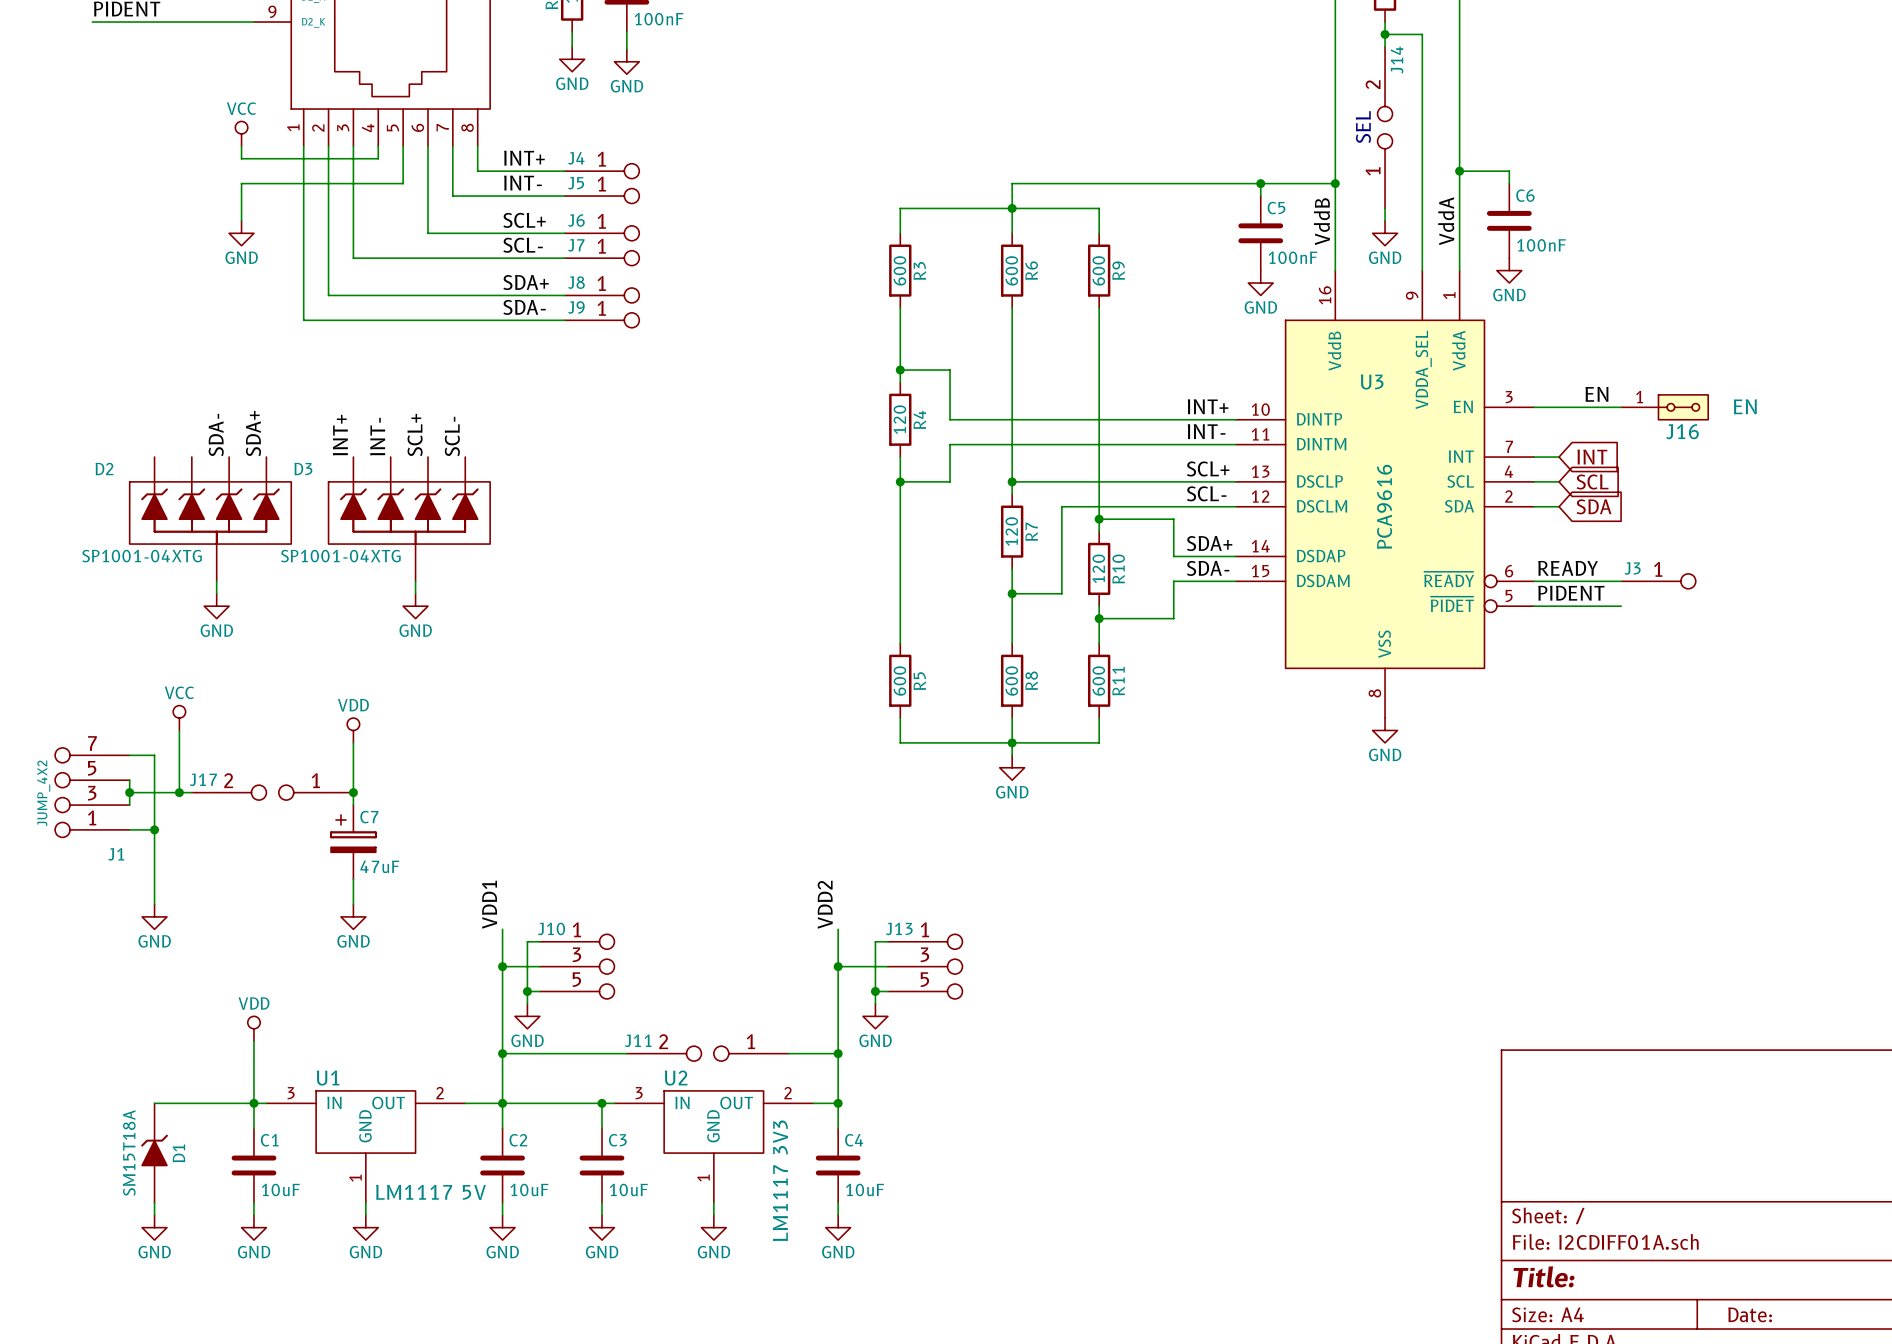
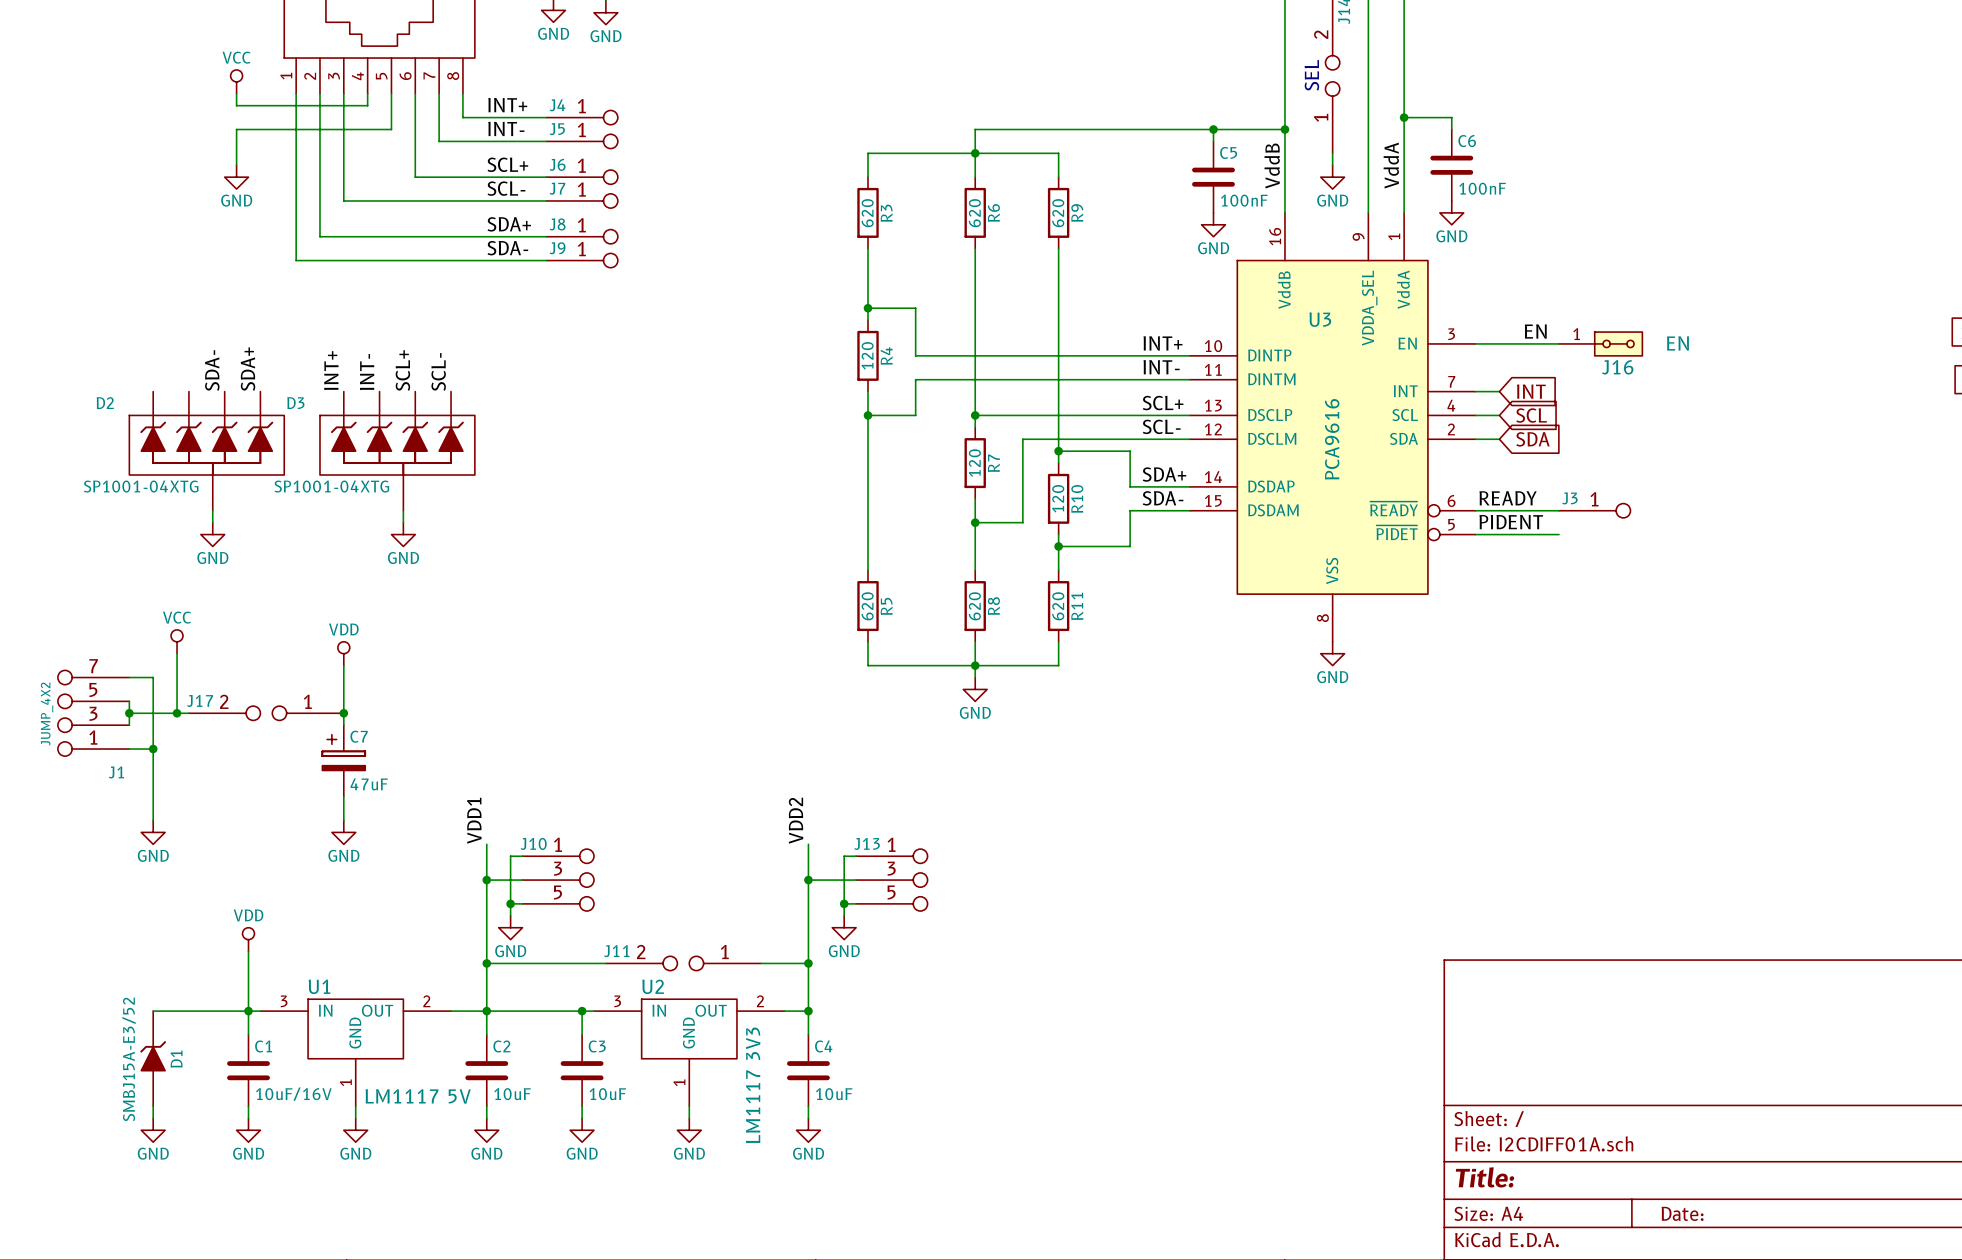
R3 value: 600 (899, 270) -> 620 (867, 213)
R6 value: 600 (1011, 270) -> 620 (974, 213)
R9 value: 600 (1098, 270) -> 620 (1058, 213)
R5 value: 600 (899, 681) -> 620 (867, 606)
R8 value: 600 (1011, 681) -> 620 (974, 606)
R11 value: 600 (1098, 681) -> 620 (1058, 606)
D1 value: SM15T18A (129, 1153) -> SMBJ15A-E3/52 (129, 1059)
C1 value: 10uF (280, 1189) -> 10uF/16V (293, 1094)

